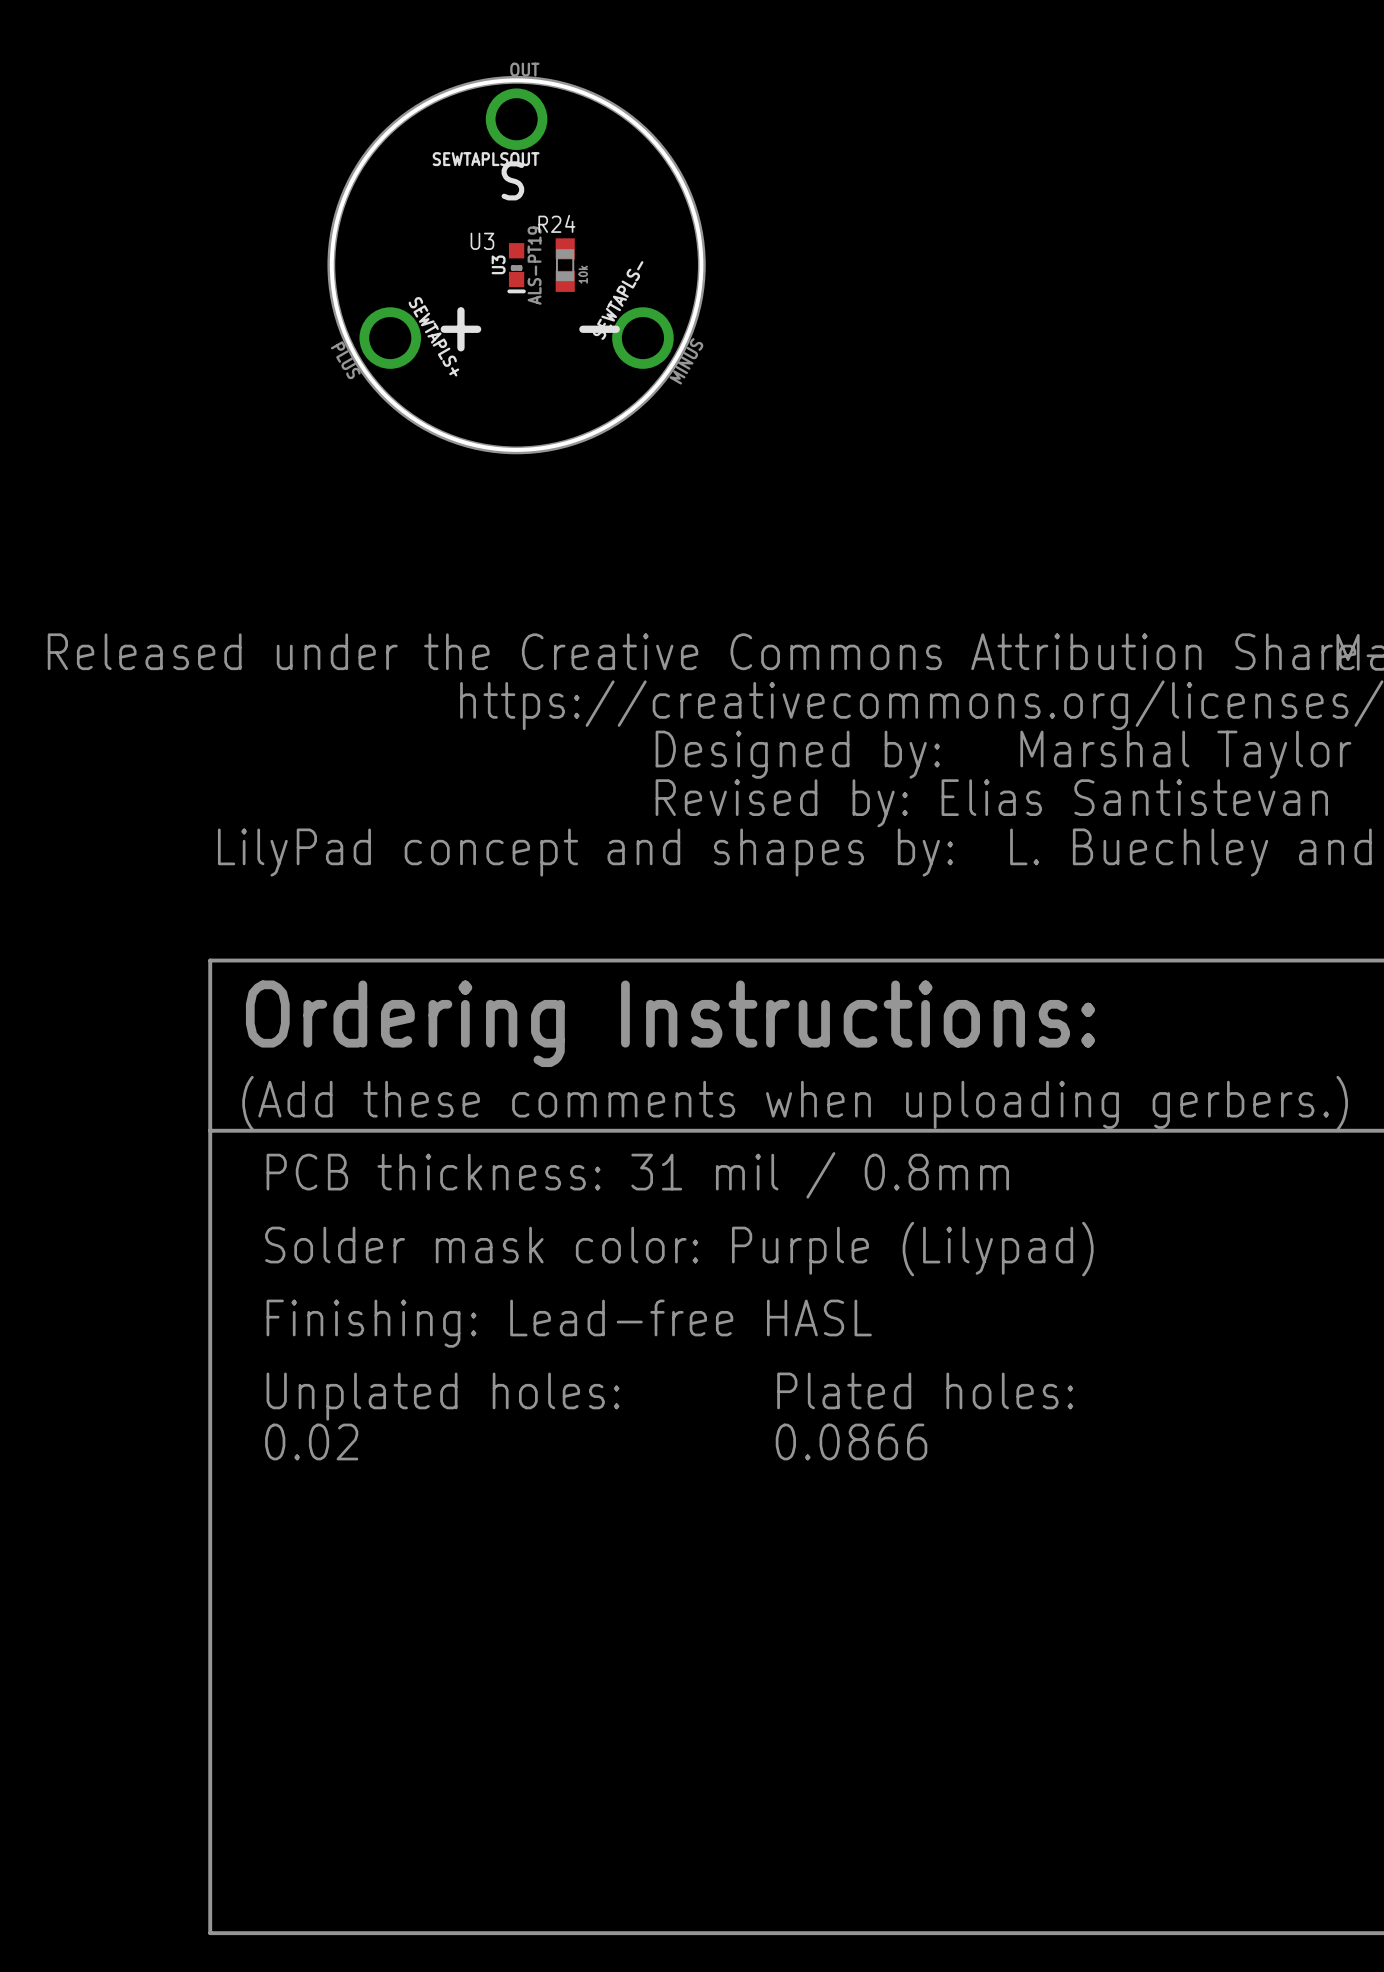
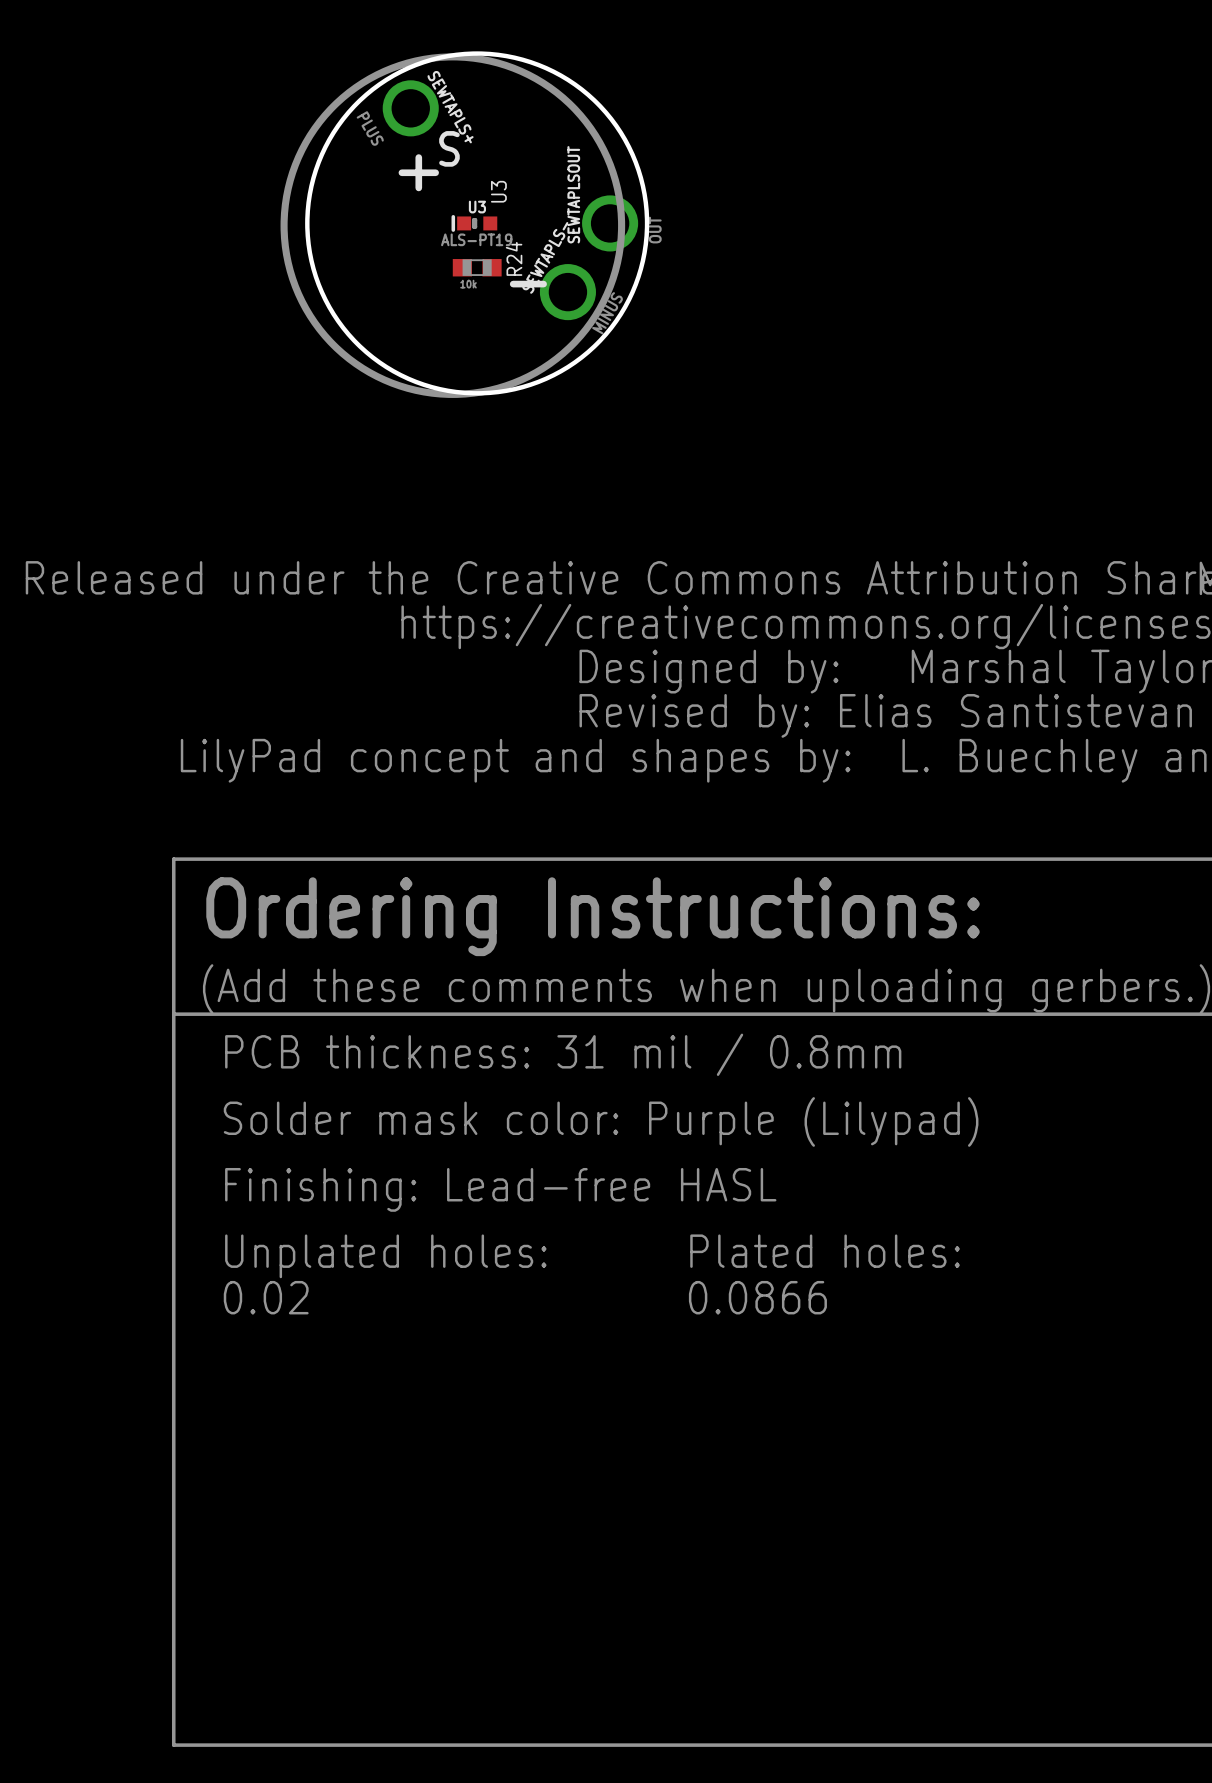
SEWTAPLSOUT value rotation: 0° (524, 69) -> 90° counterclockwise (655, 230)
SEWTAPLSOUT value position: OUT (524, 69) -> OUT (655, 230)
round board edge: none -> [305, 51, 650, 396]
round board edge: [329, 78, 704, 452] -> none
SEWTAPLSOUT position: (516, 119) -> (610, 223)
SEWTAPLSOUT name rotation: 0° (486, 159) -> 90° counterclockwise (573, 194)
text rotation: 0° (482, 241) -> 90° counterclockwise (498, 191)
text position: U3 (482, 241) -> U3 (498, 191)
R24 rotation: 0° (565, 265) -> 90° clockwise (477, 267)
R24 position: (565, 265) -> (477, 267)
U3 rotation: 0° (516, 268) -> 90° clockwise (474, 223)
text rotation: 0° (460, 329) -> 90° clockwise (418, 172)
text position: + (460, 329) -> + (418, 172)
SEWTAPLS+ position: (390, 338) -> (410, 108)

